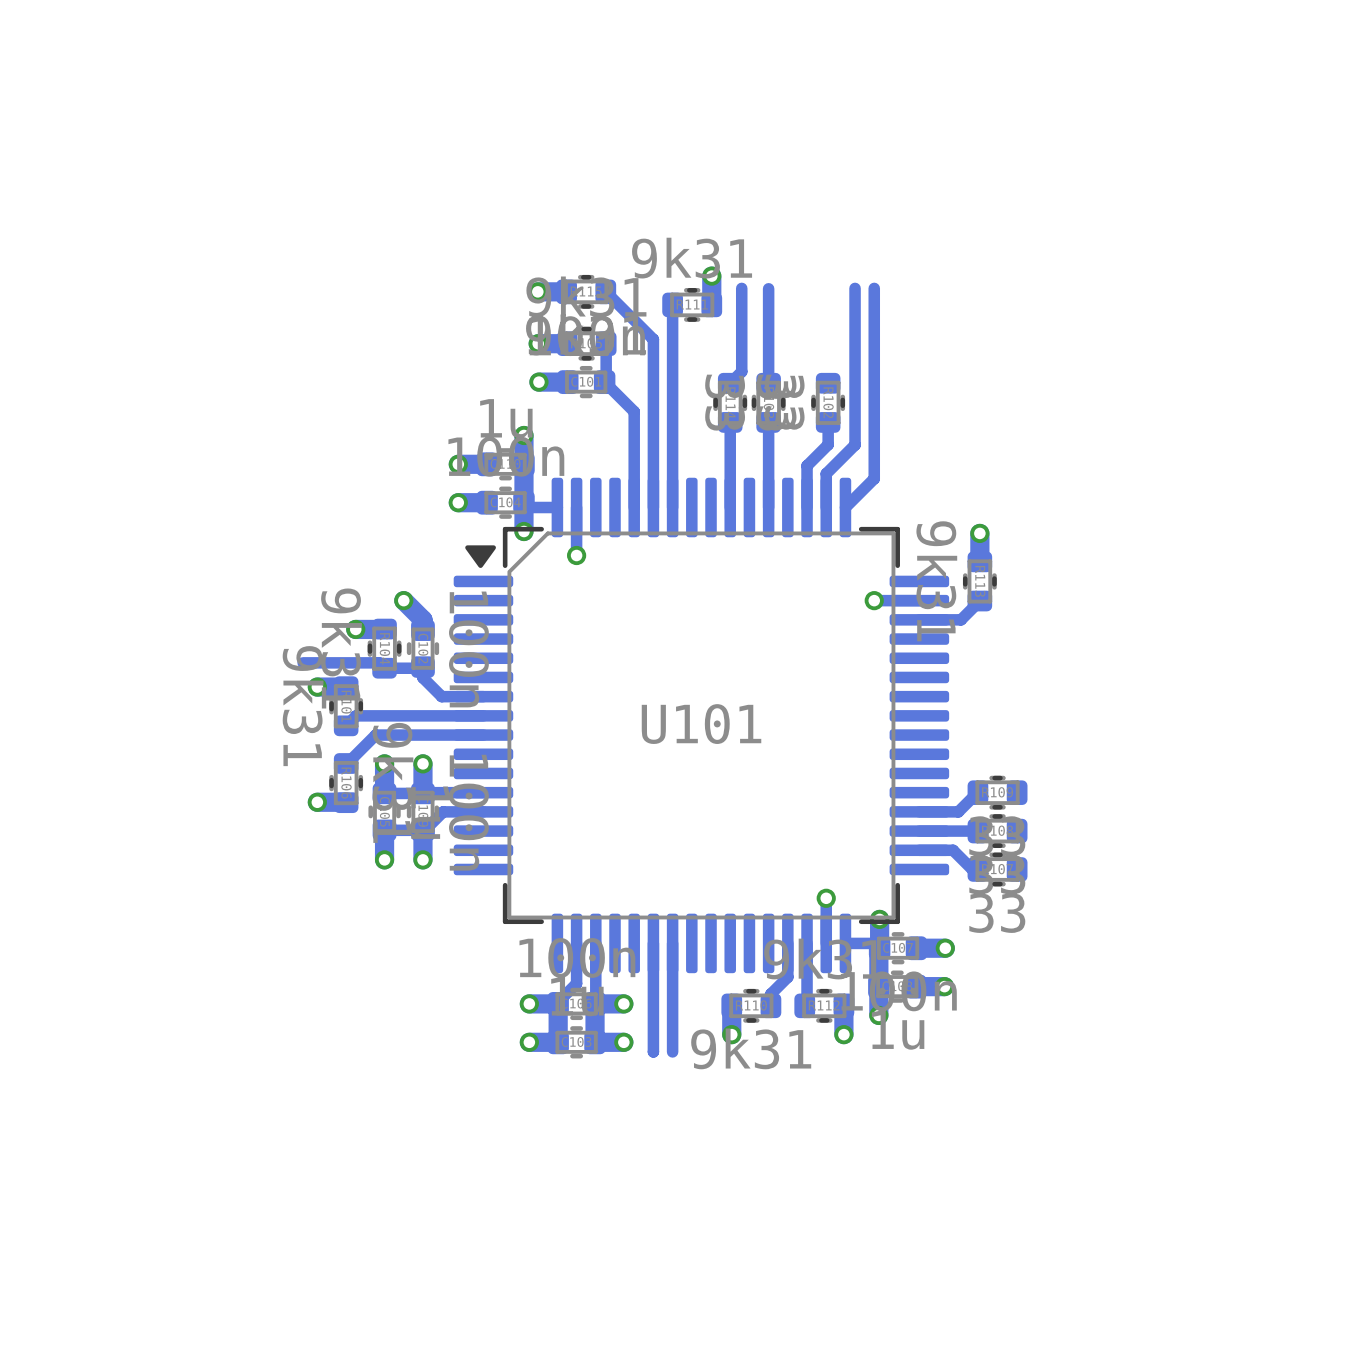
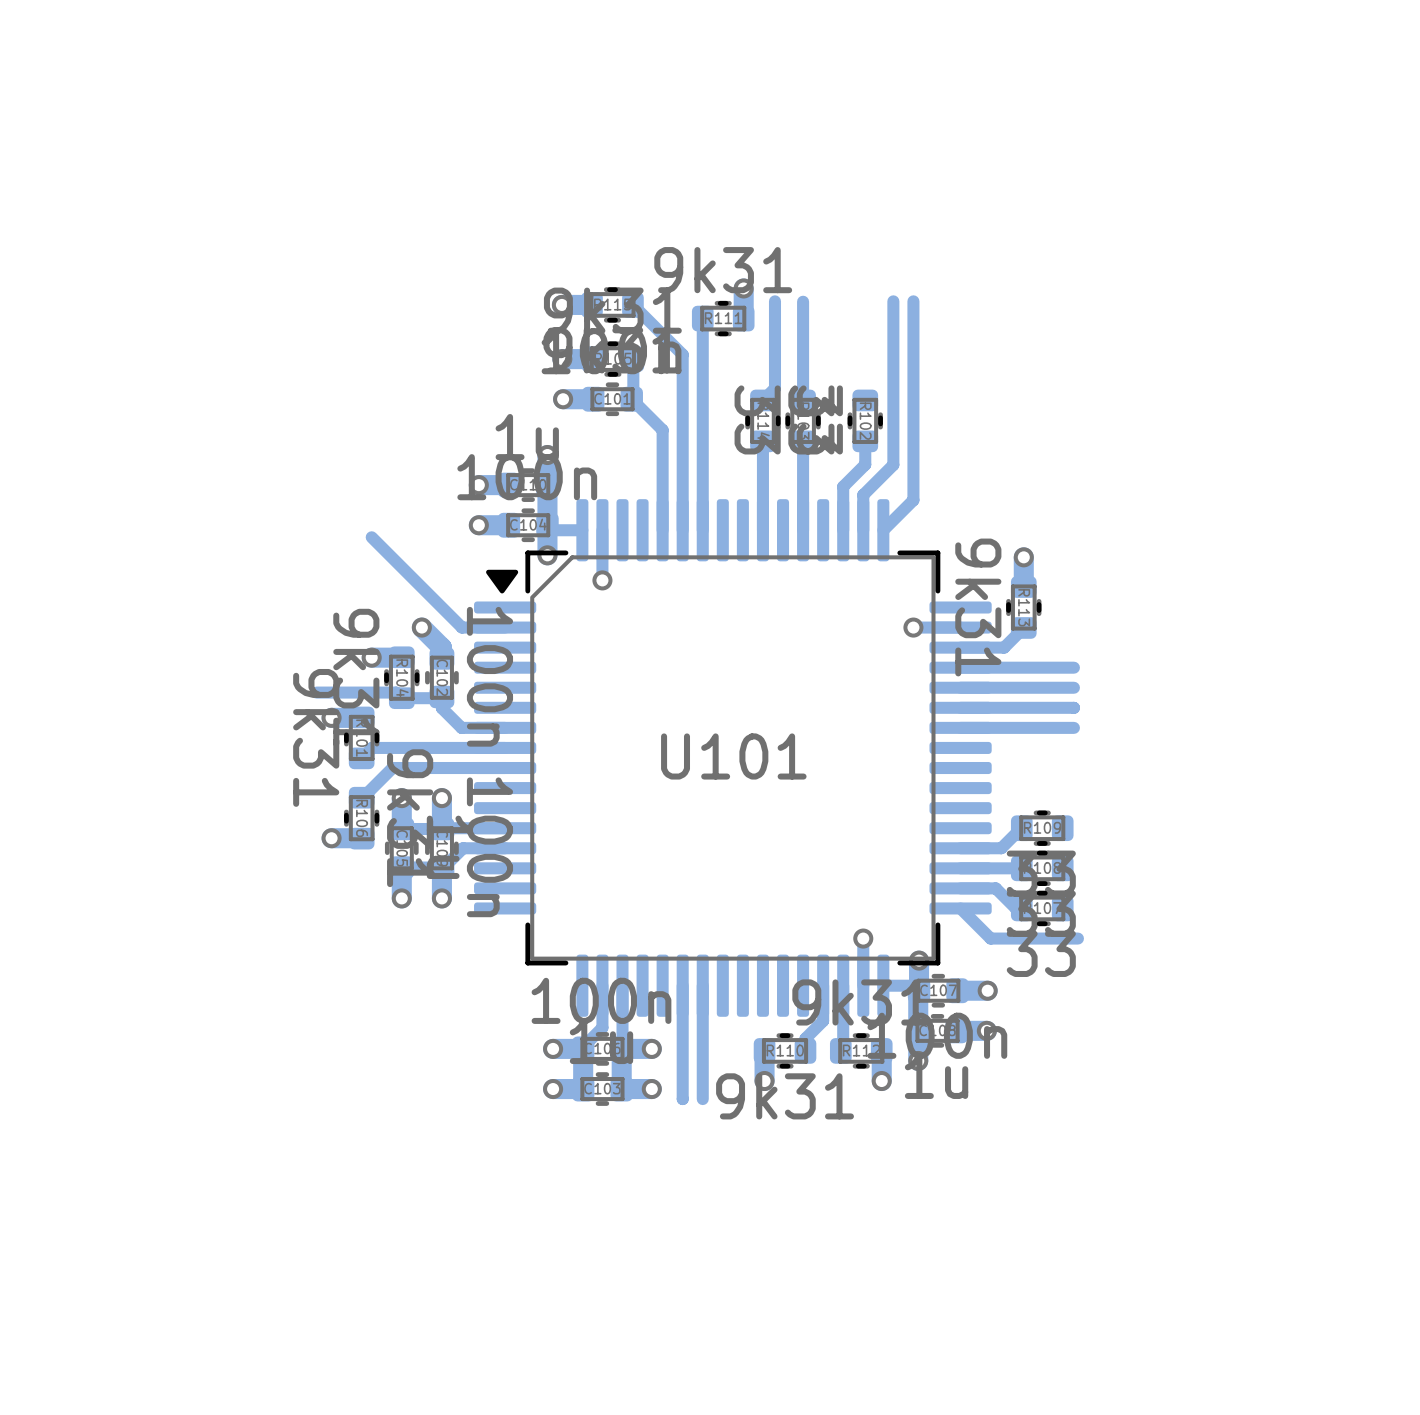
track: none -> (371, 537) (461, 627) (505, 627)
track: none -> (1073, 667) (960, 667)
track: none -> (1073, 687) (960, 687)
track: none -> (1073, 707) (960, 707)
track: none -> (1073, 727) (960, 727)
track: none -> (960, 908) (990, 938) (1077, 938)

